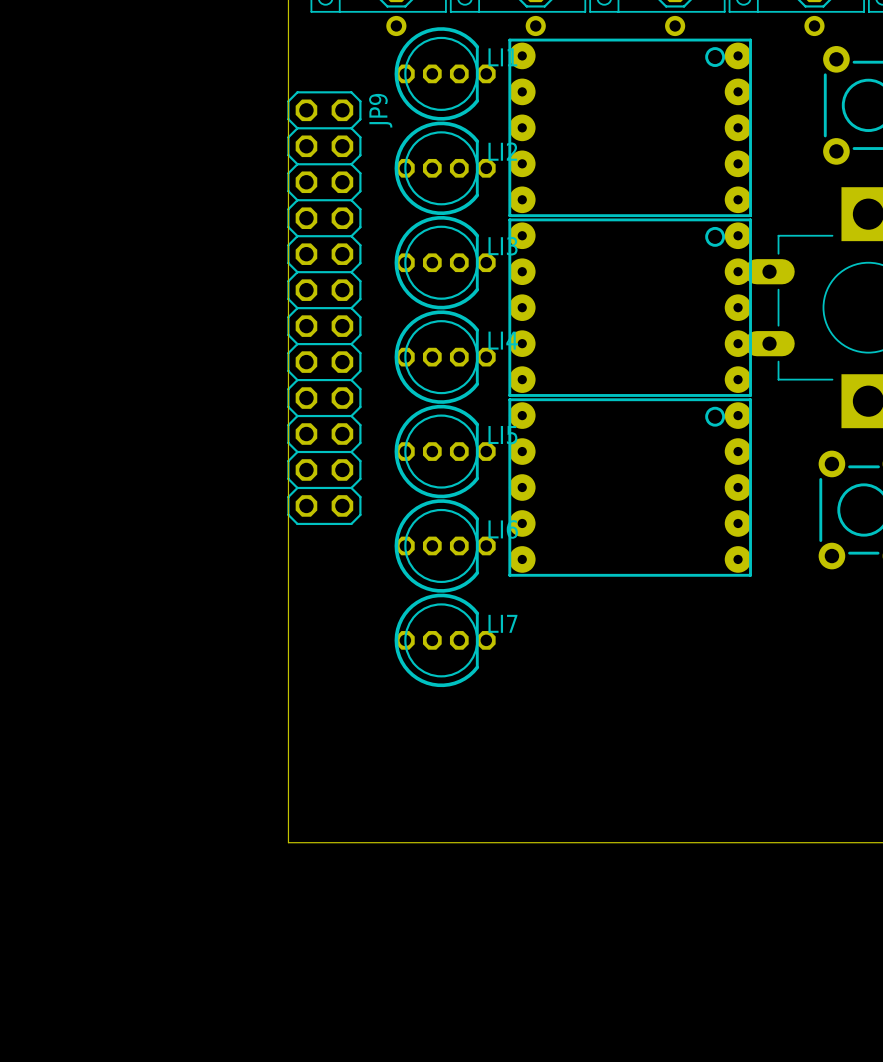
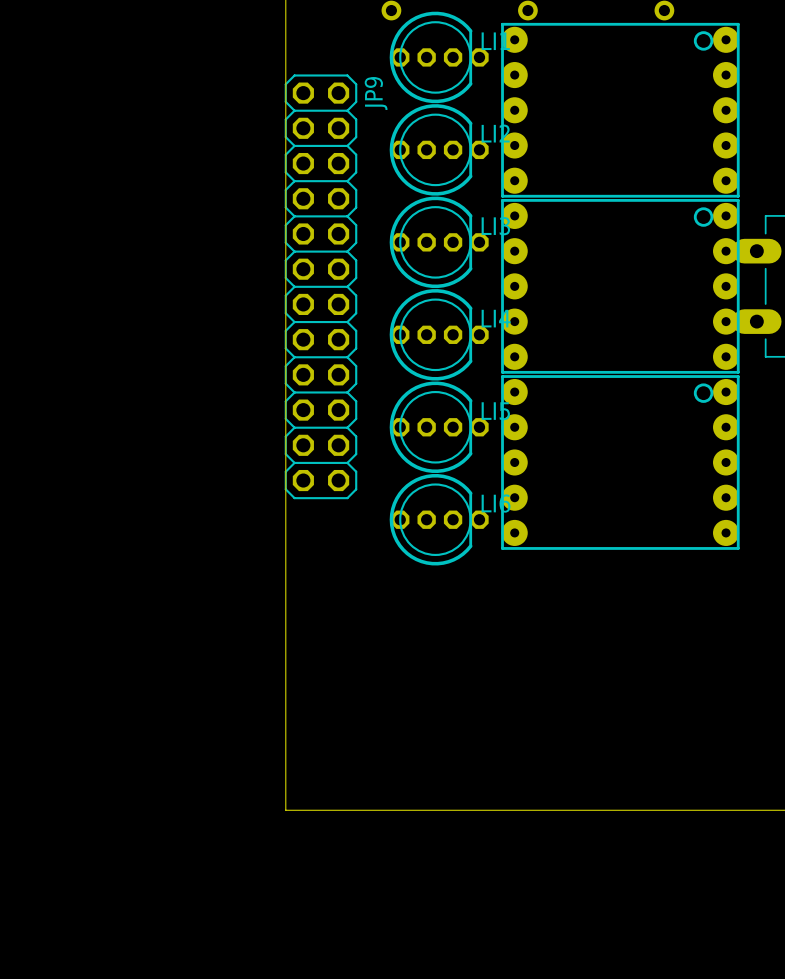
LI7: (445, 640) -> none

